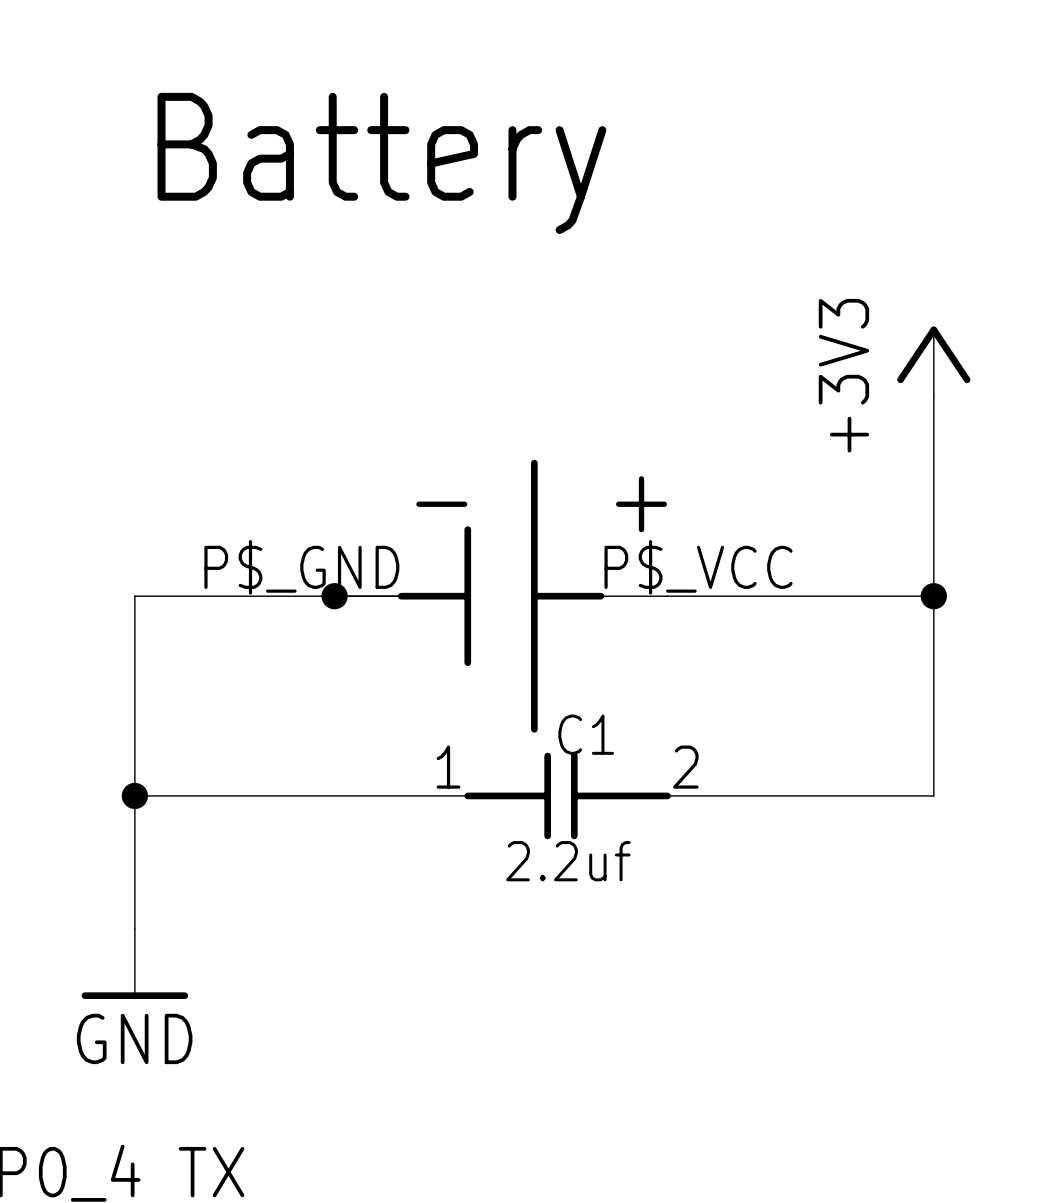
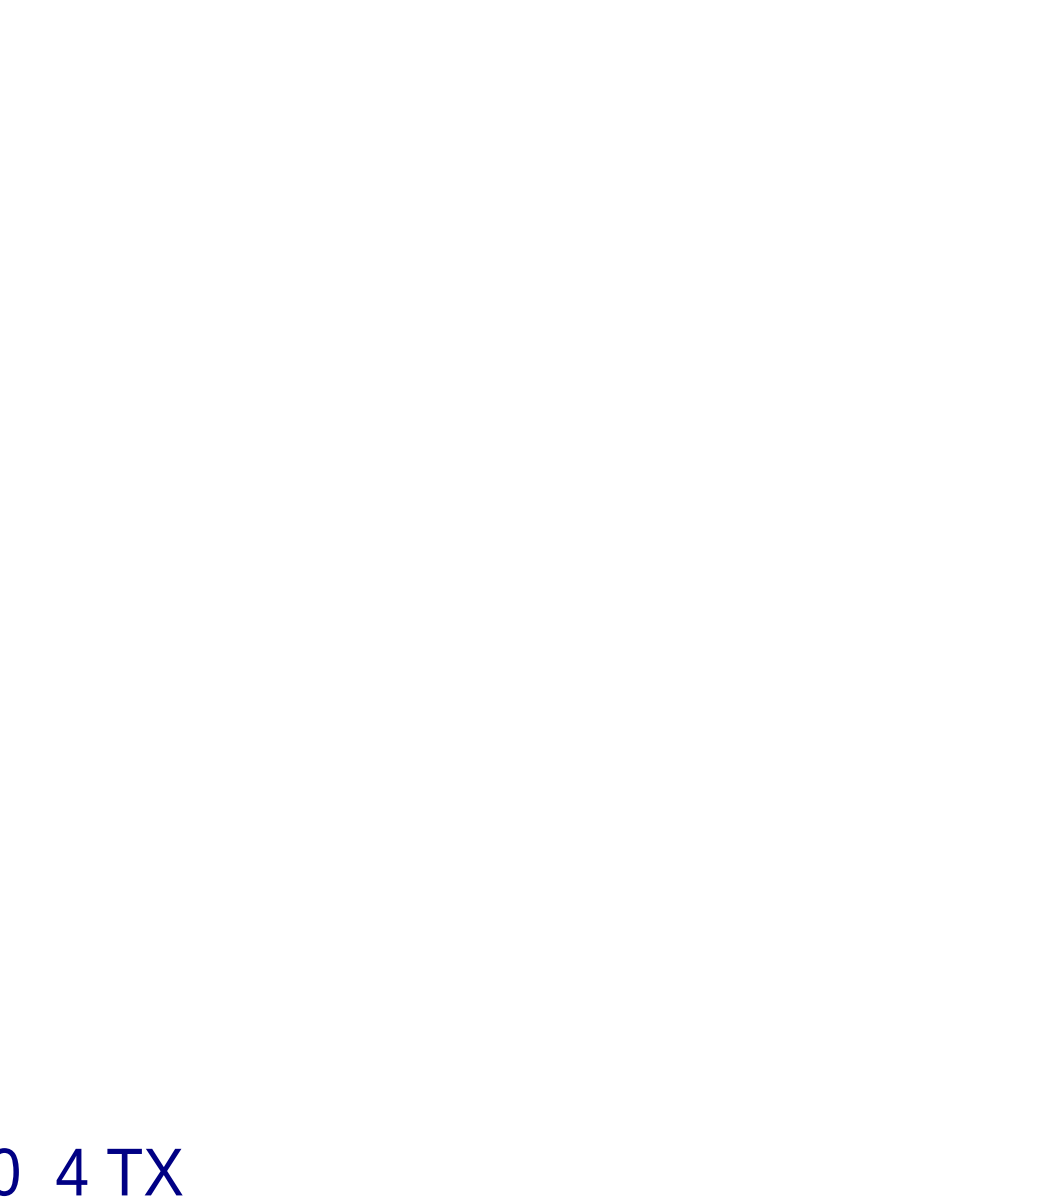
text: Battery (381, 163) -> none
power symbol: +3V3 (933, 361) -> none
wire: (933, 396) (933, 795) (667, 795) -> none
junction: (334, 596) -> none
wire: (401, 596) (134, 596) (134, 929) -> none
part: (501, 596) -> none
wire: (667, 596) (933, 596) -> none
junction: (933, 596) -> none
wire: (134, 795) (467, 795) -> none
junction: (134, 795) -> none
C1: 2.2uf (567, 795) -> none
power symbol: GND (134, 964) -> none

